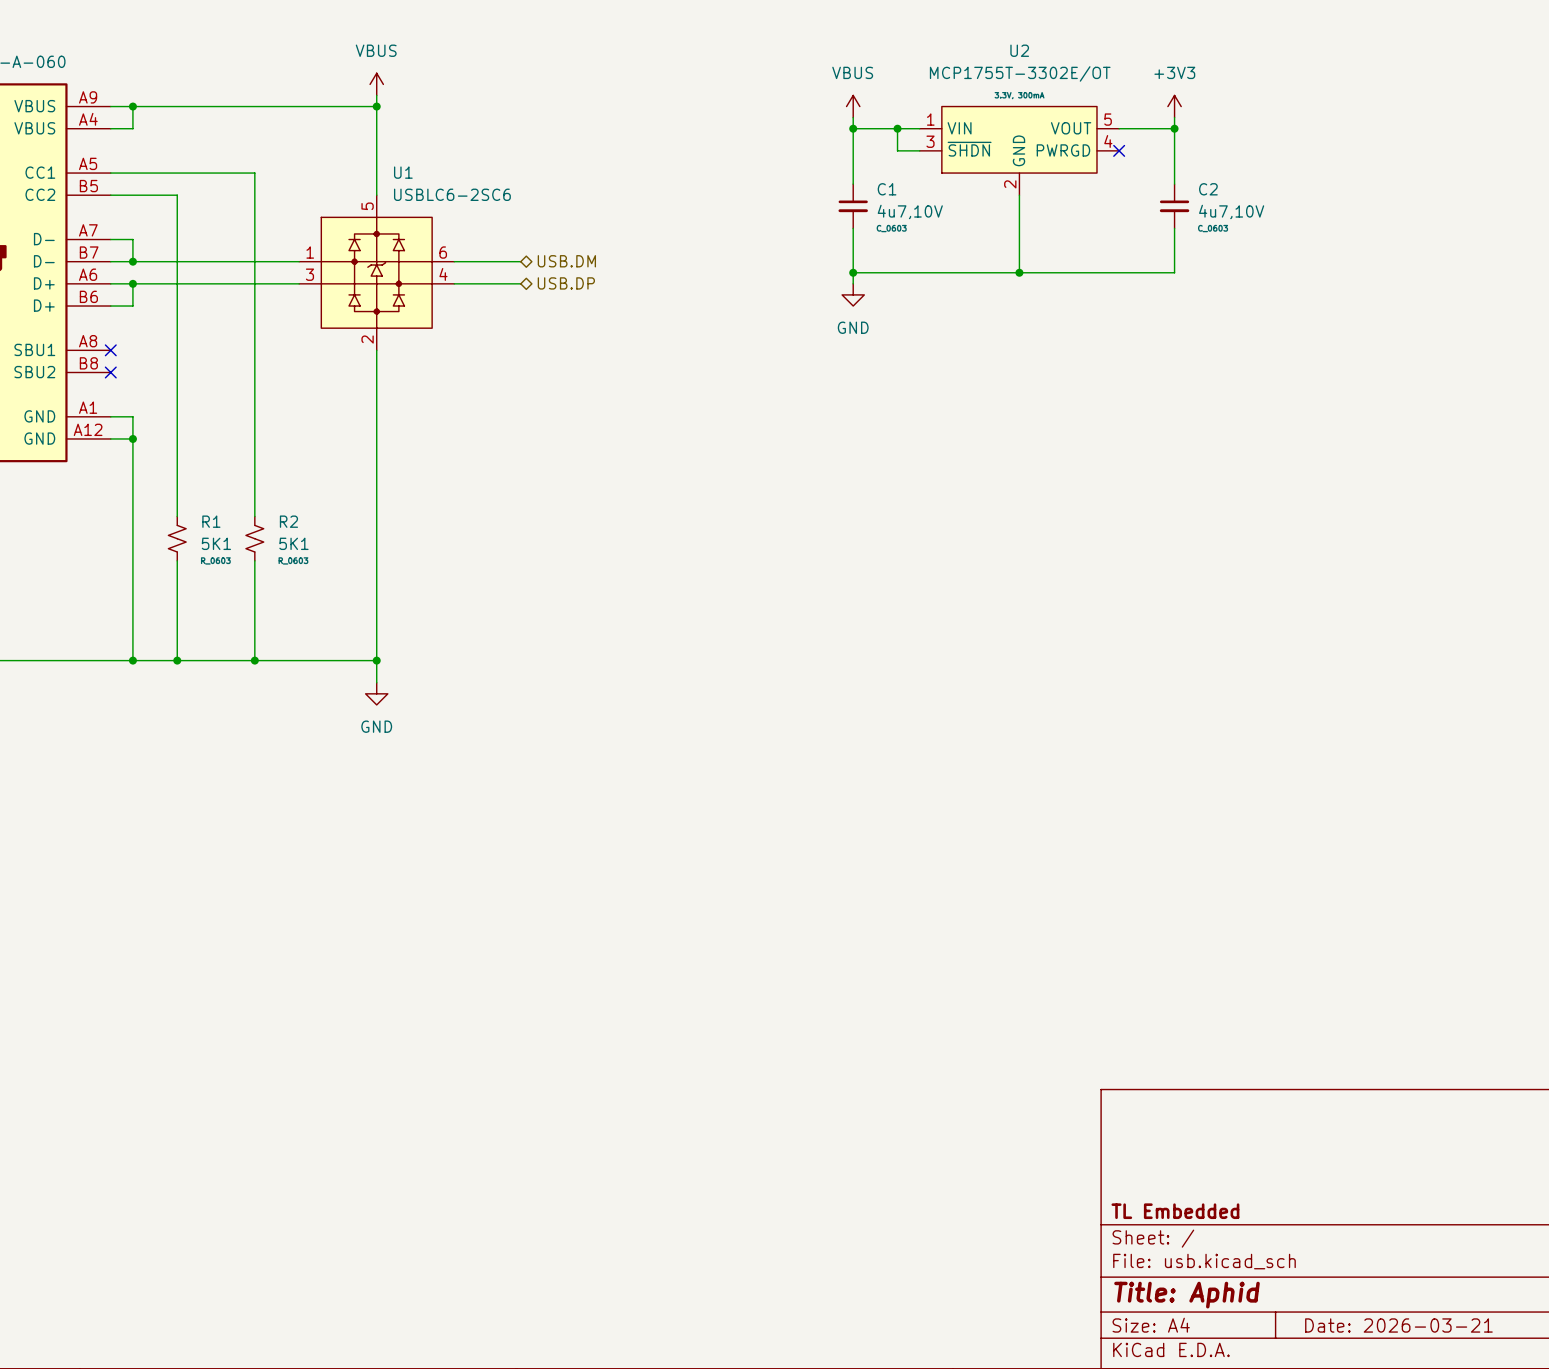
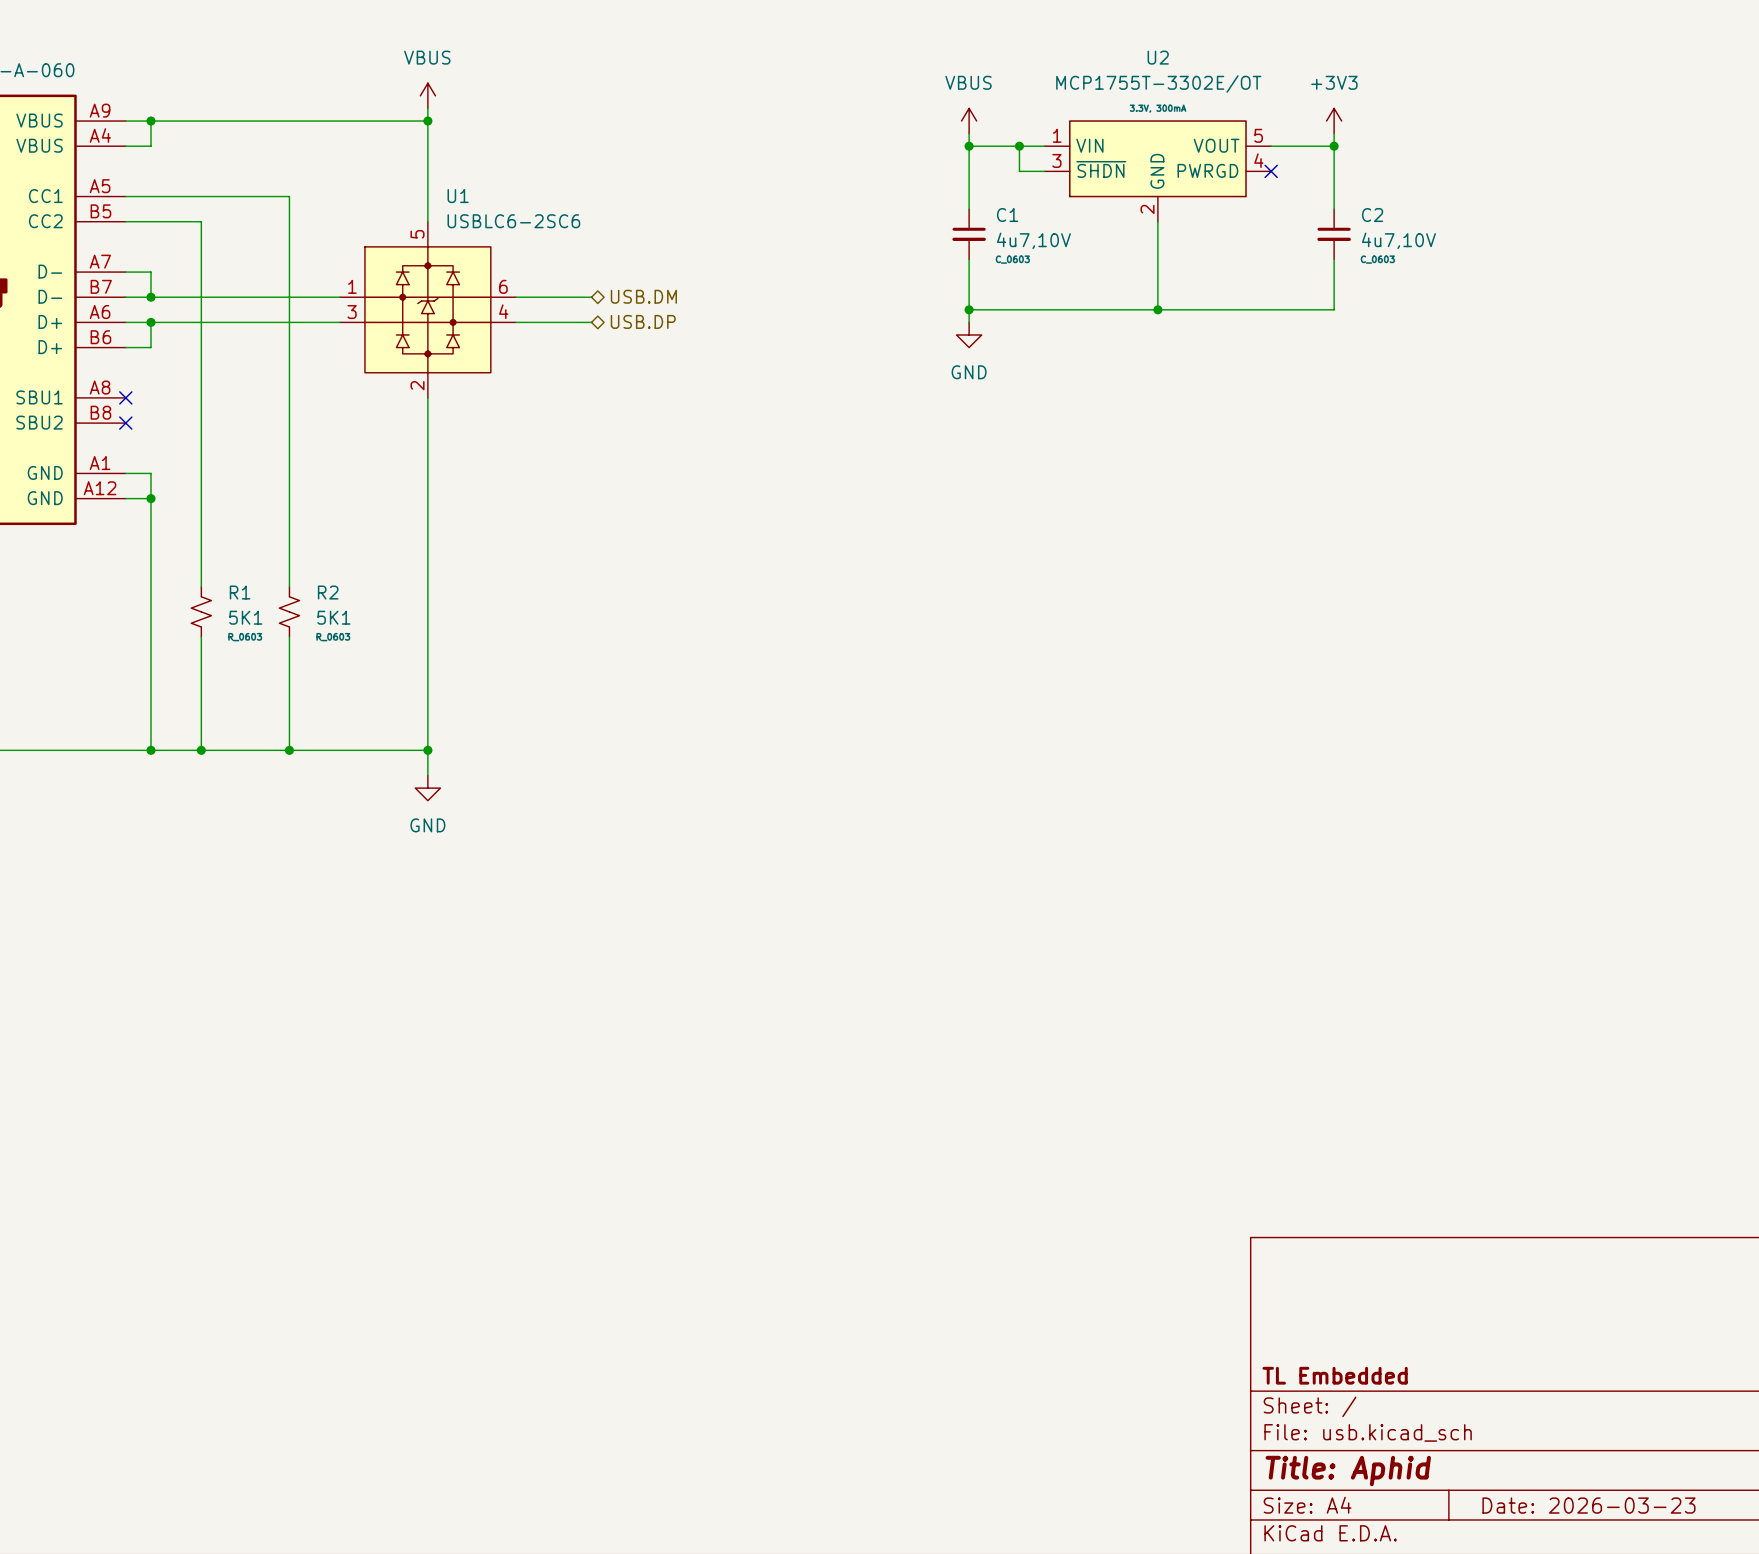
title block: Date: 2026-03-21 (1398, 1325) -> Date: 2026-03-23 (1588, 1505)

